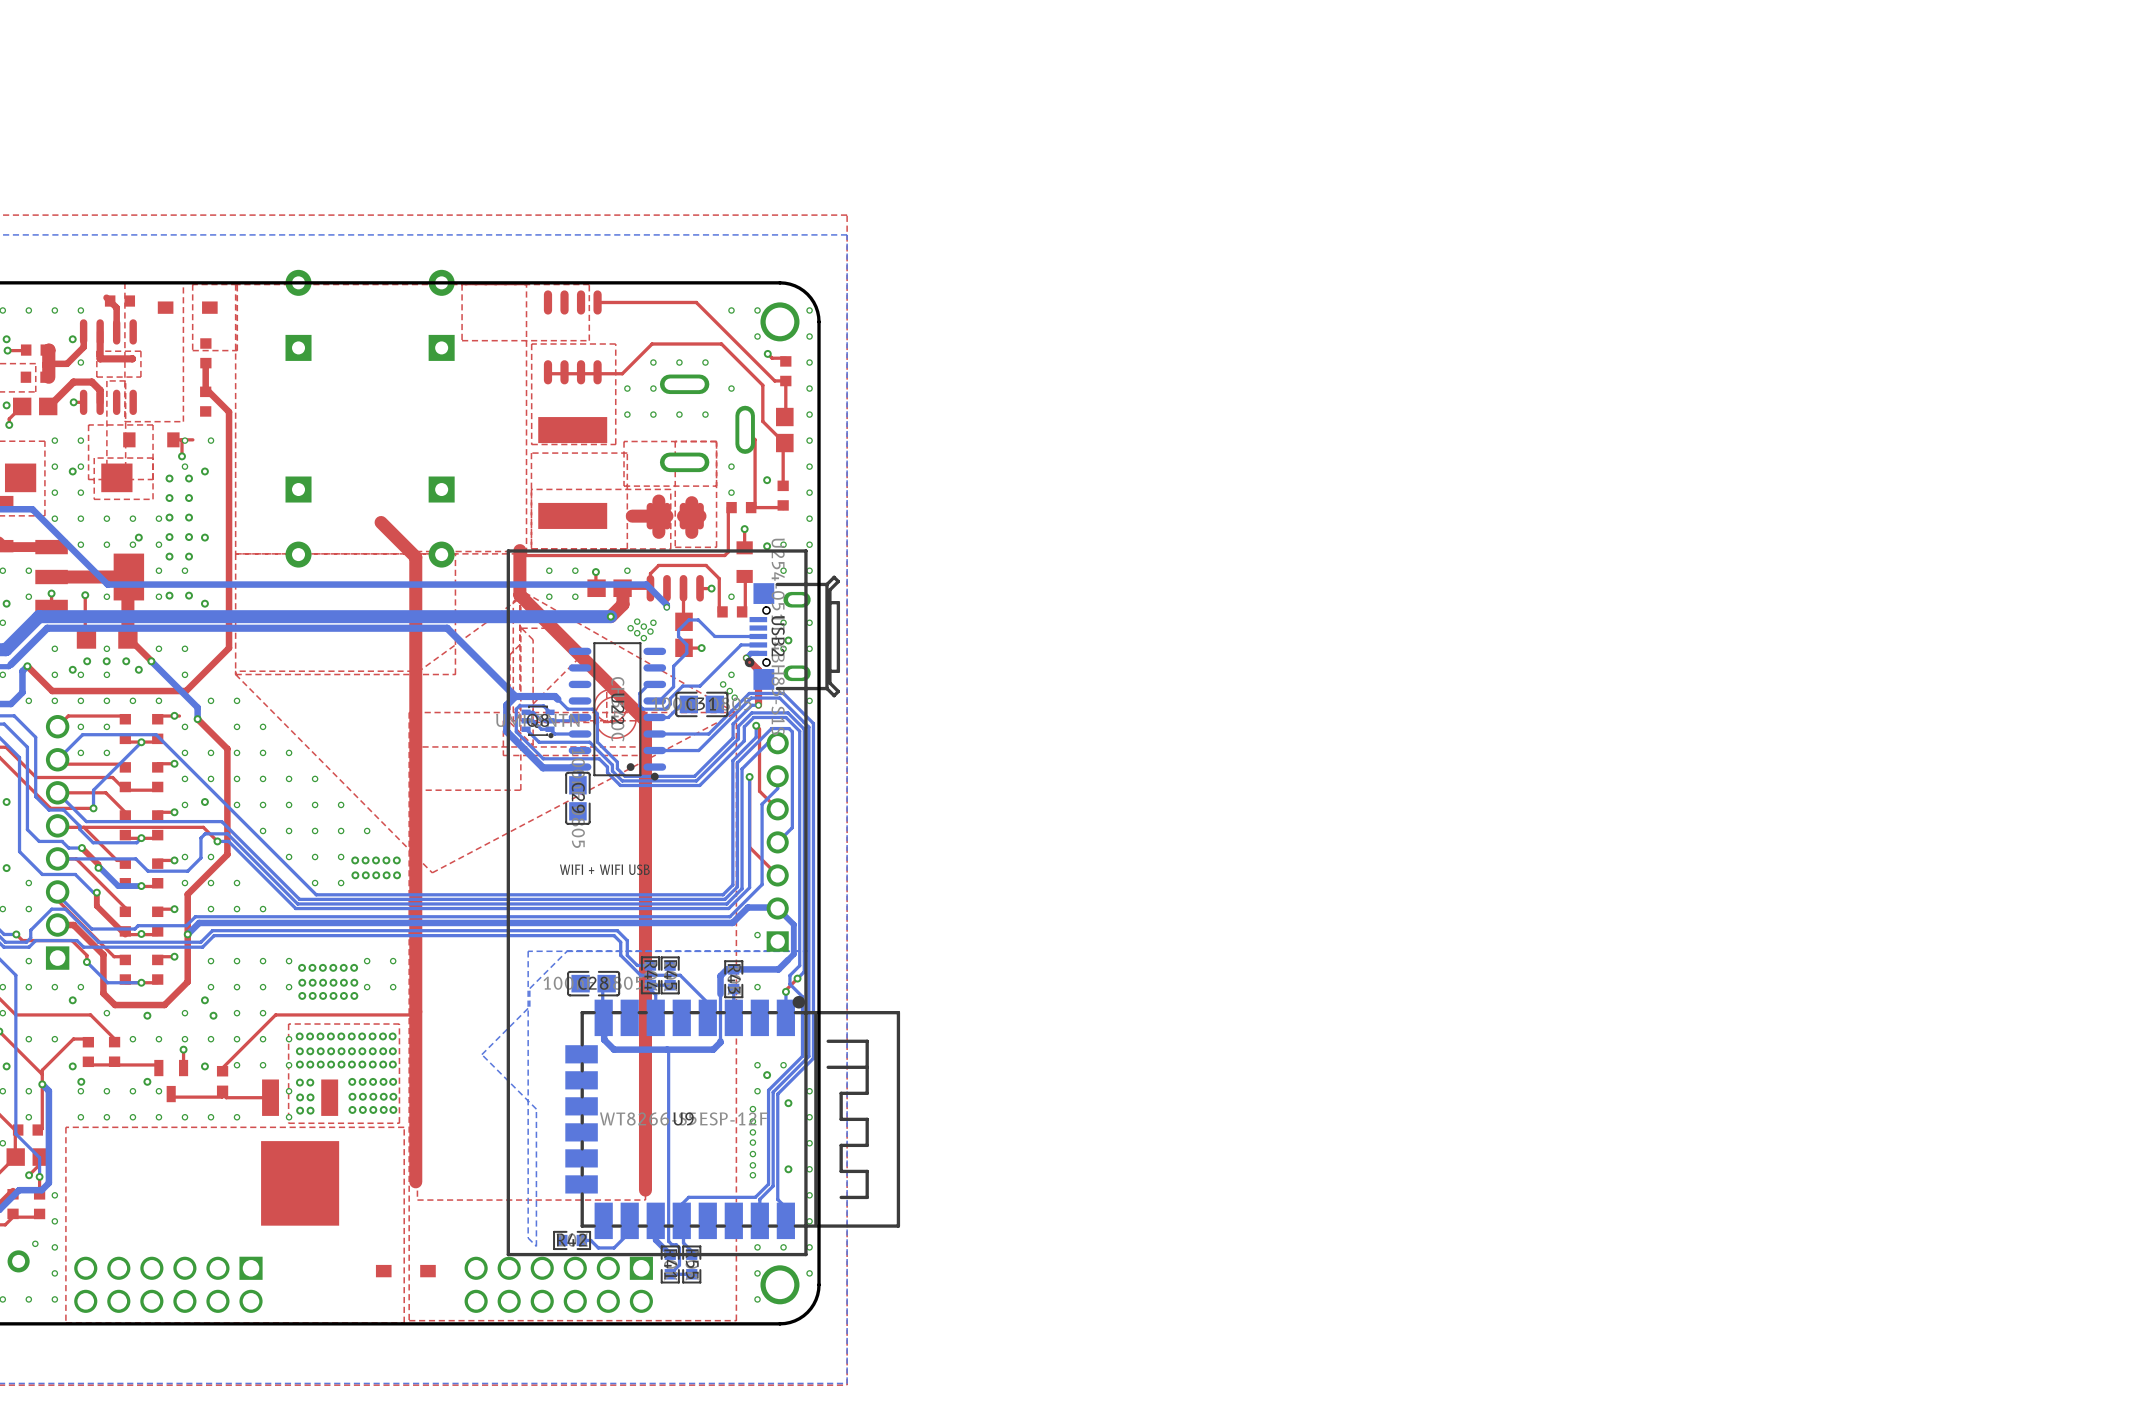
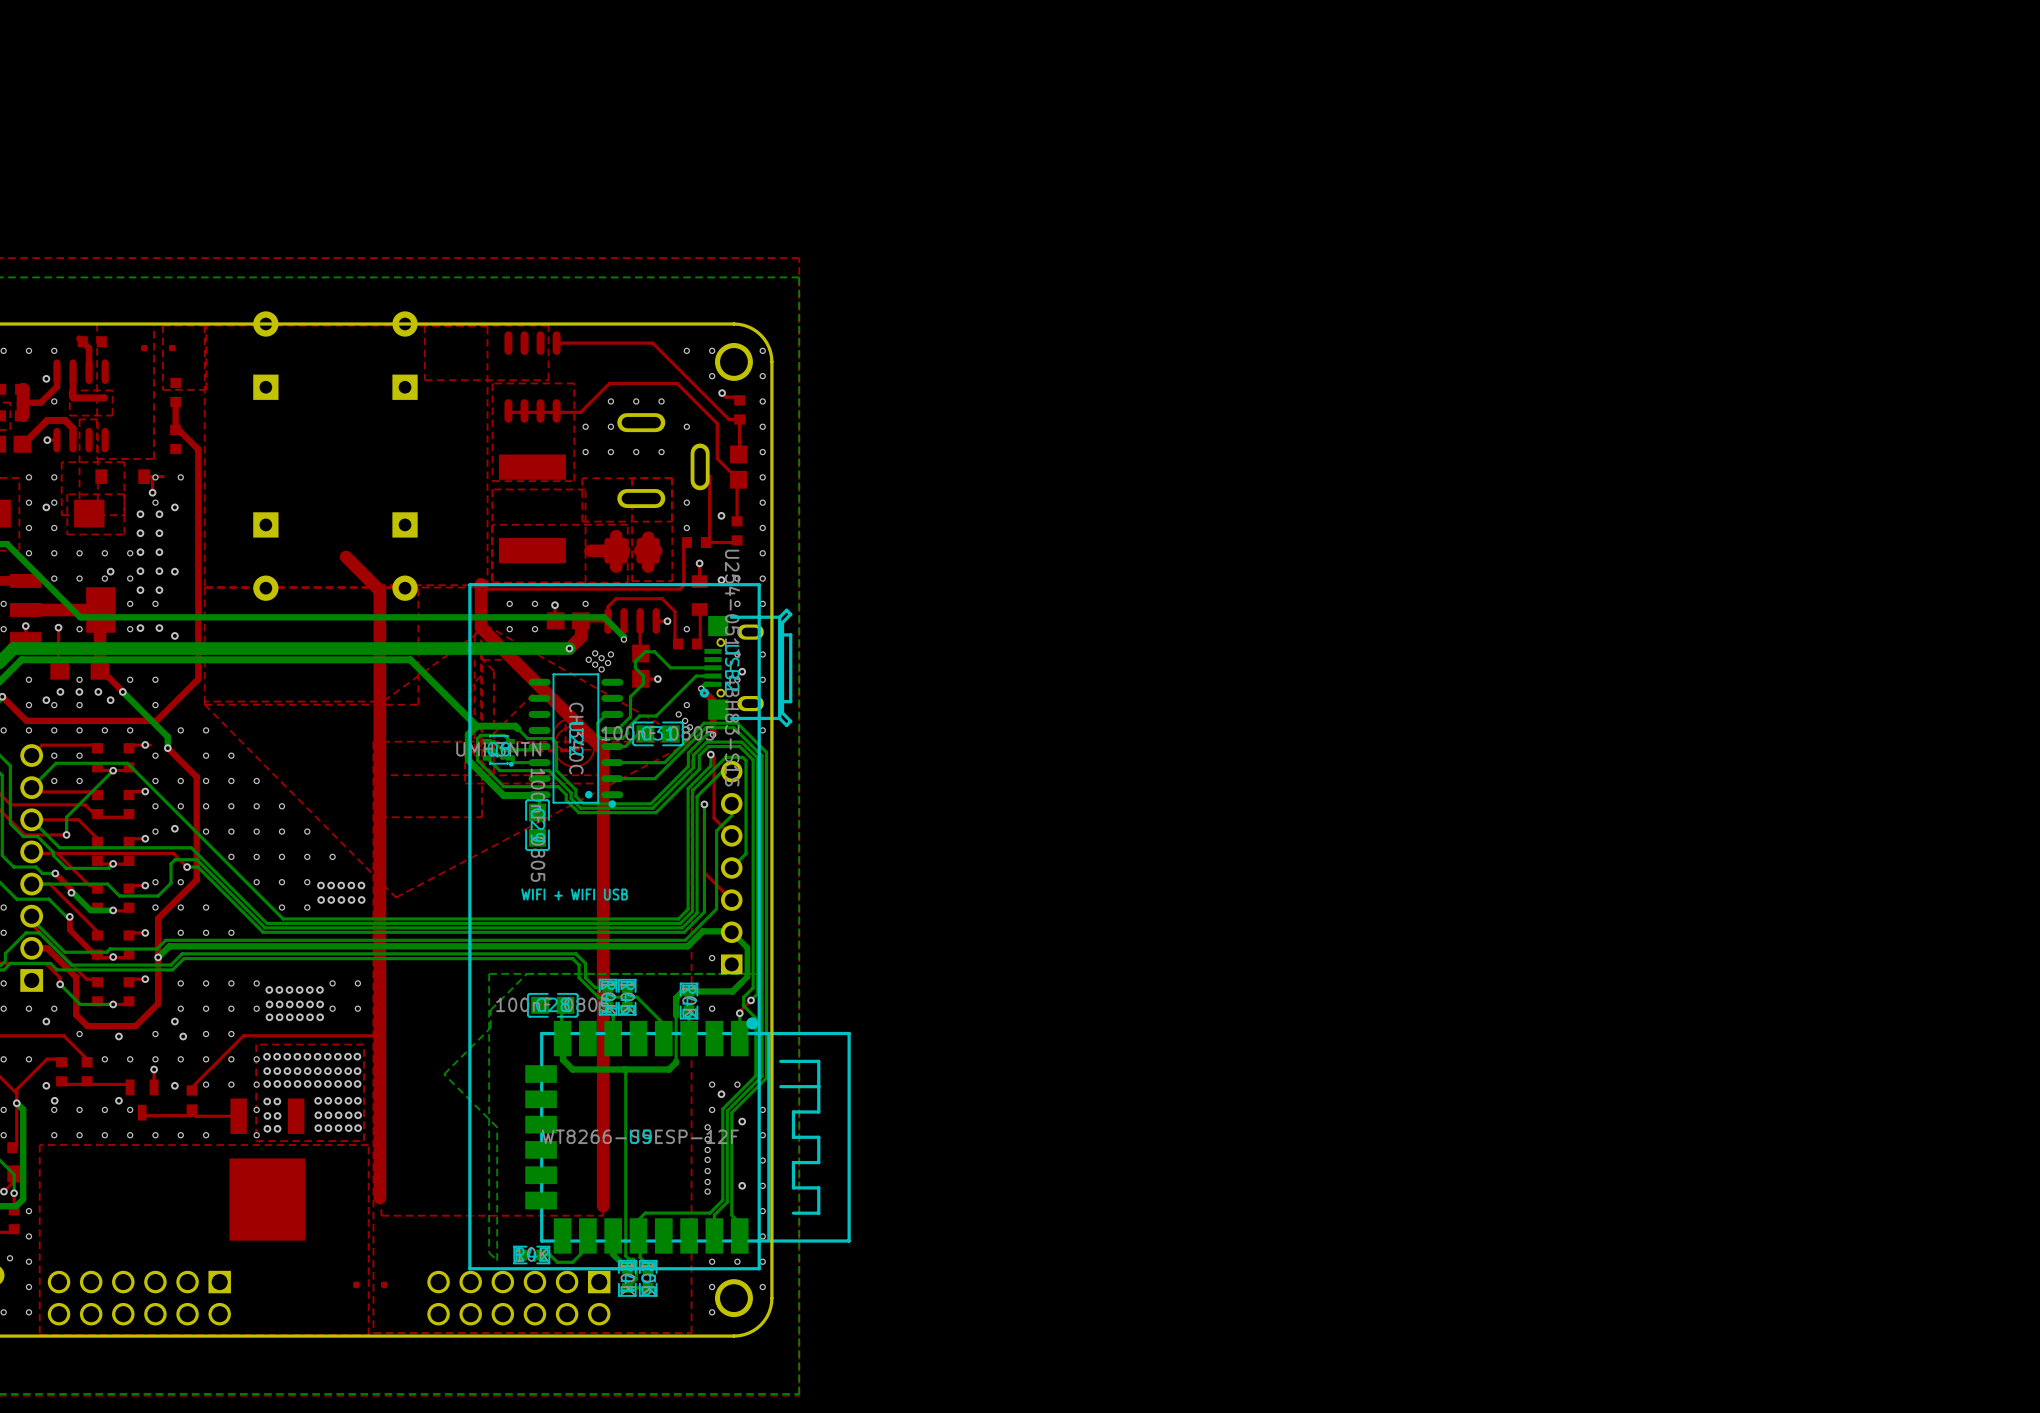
part footprint: [157, 301, 218, 314] -> [141, 344, 176, 352]
part footprint: [375, 1264, 436, 1278] -> [353, 1281, 388, 1288]

